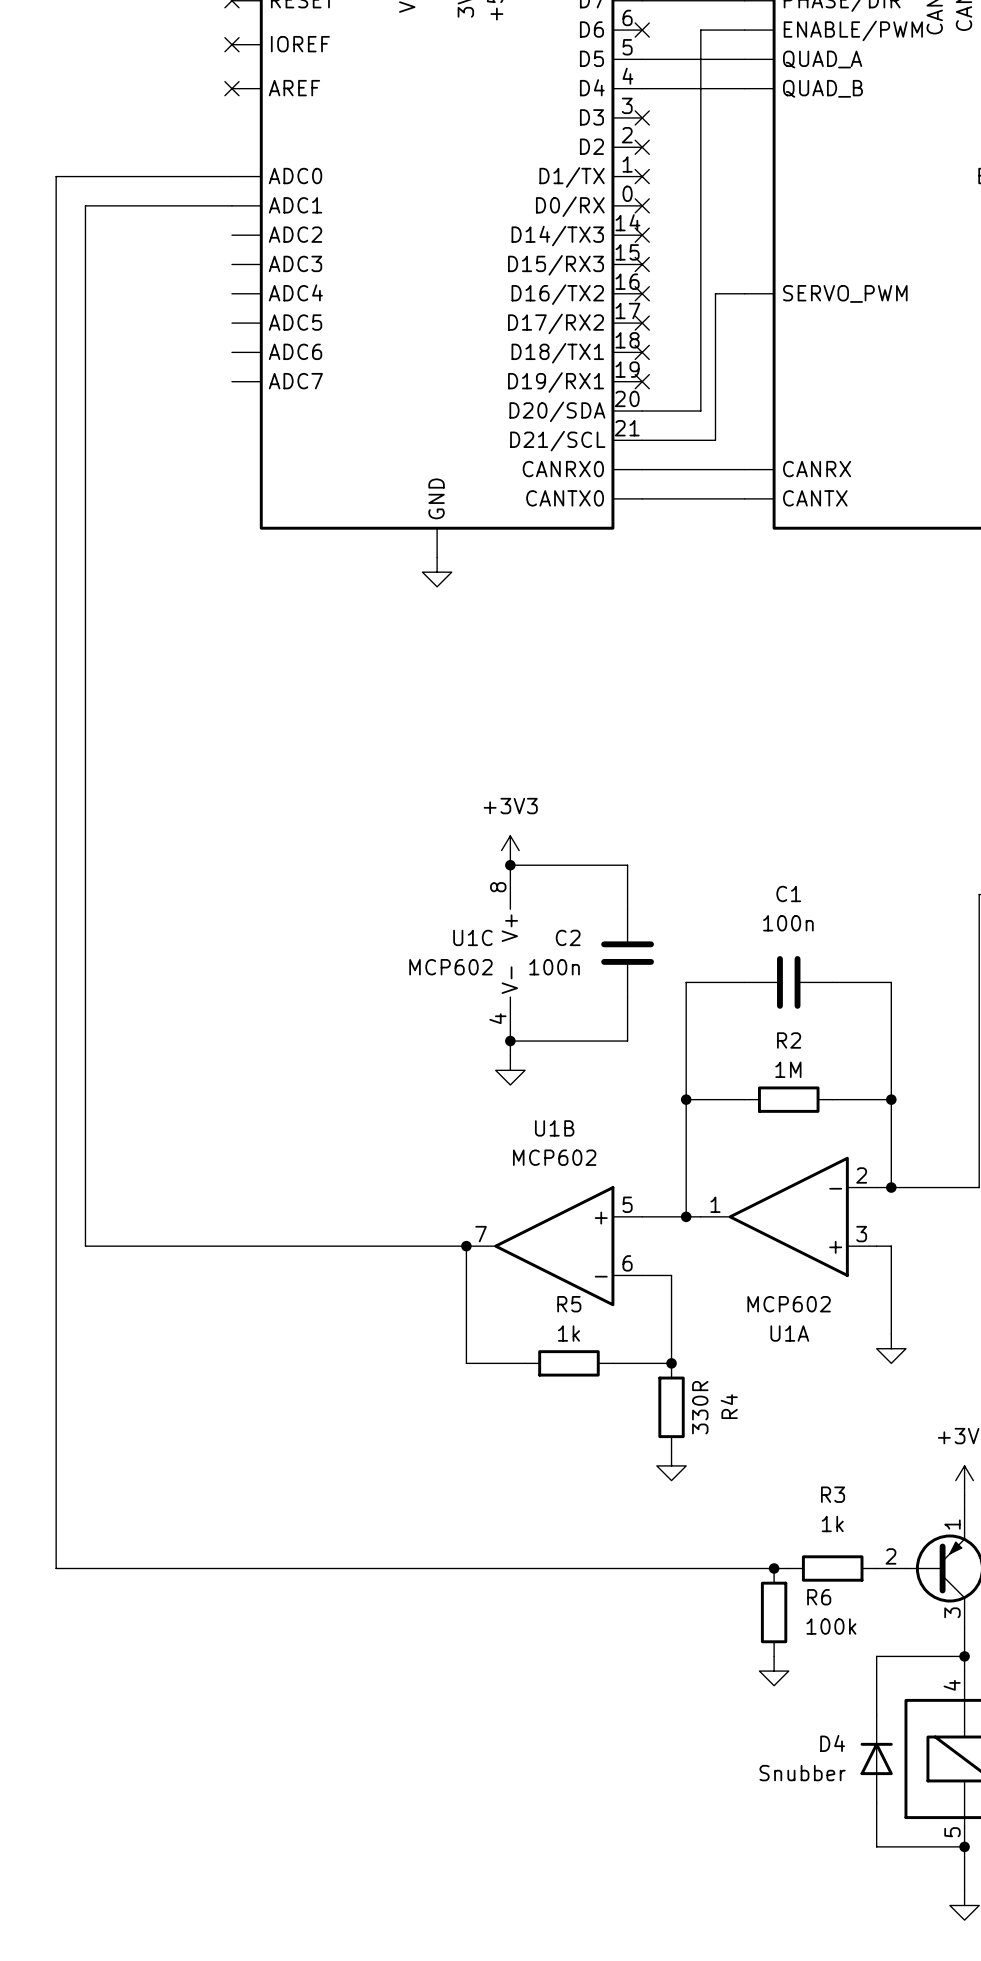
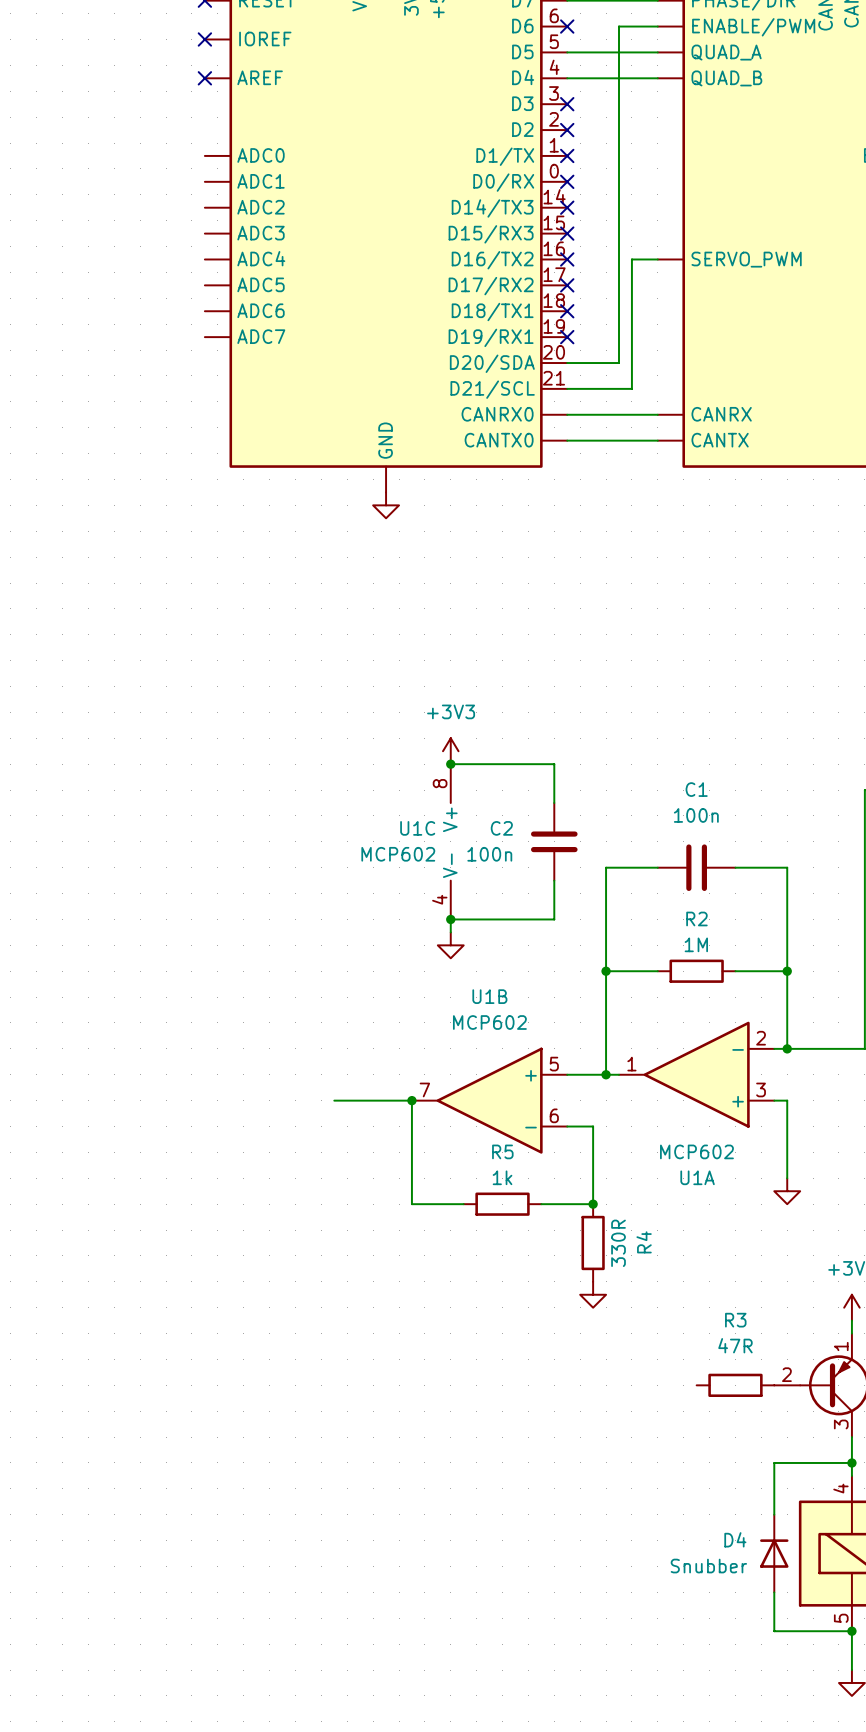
wire: (231, 176) (56, 176) (56, 1568) (788, 1568) -> none
wire: (231, 205) (85, 205) (85, 1246) (378, 1246) -> none
R3 value: 1k (832, 1524) -> 47R (735, 1345)
junction: (774, 1568) -> none
R6: 100k (774, 1612) -> none
power symbol: (774, 1671) -> none

